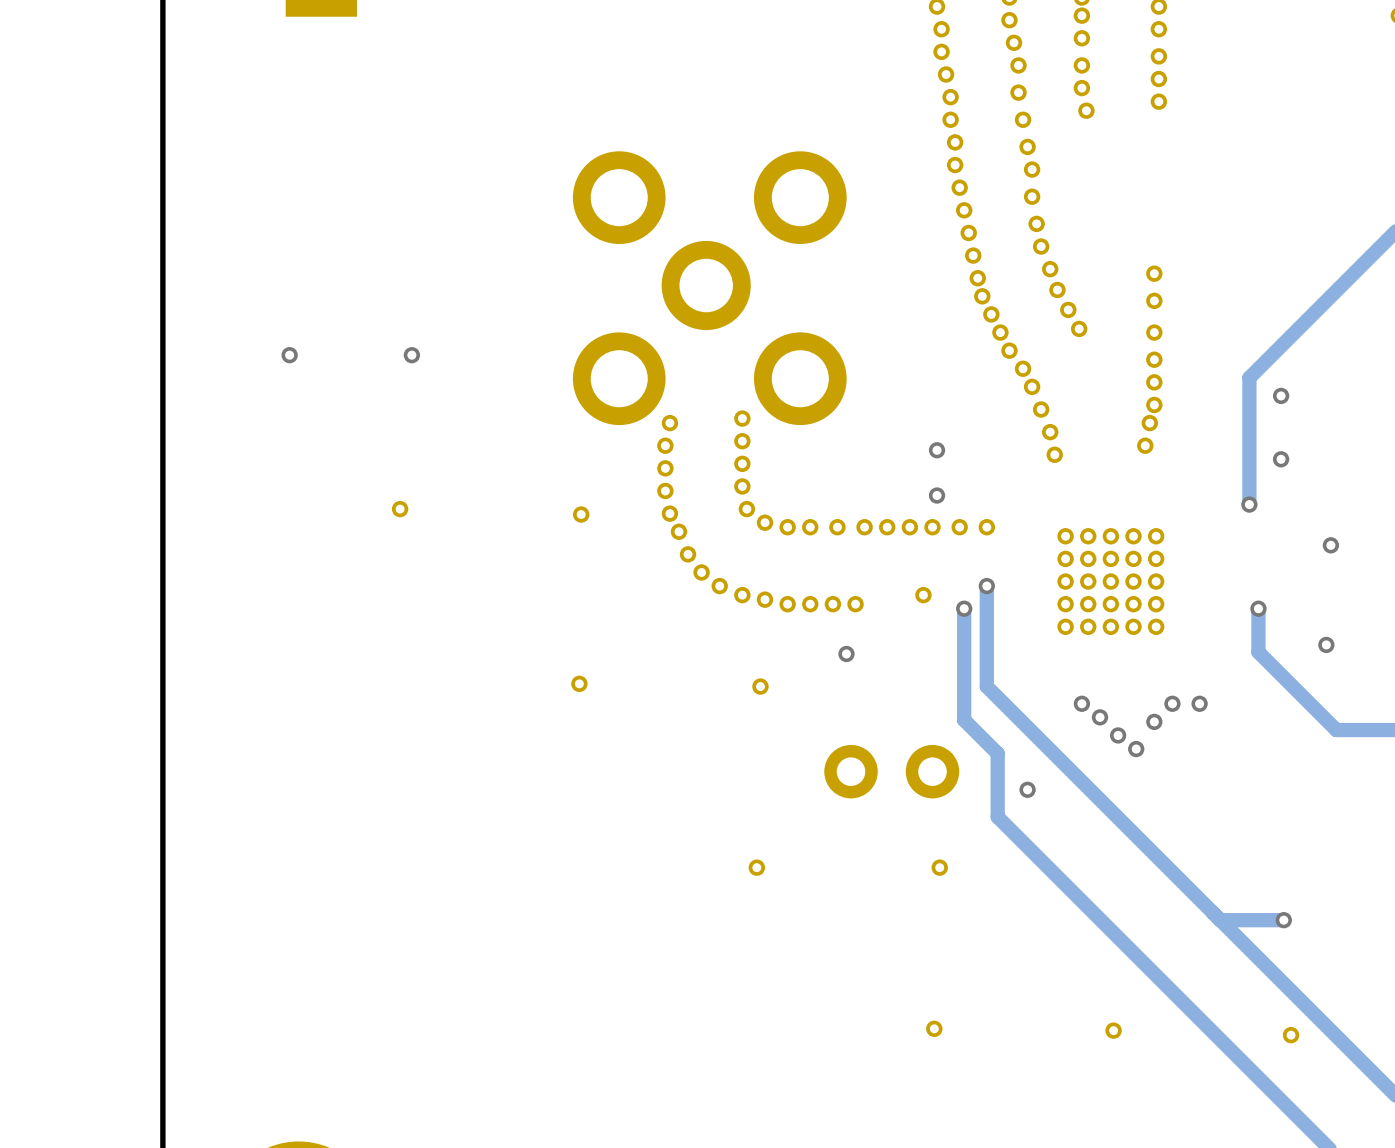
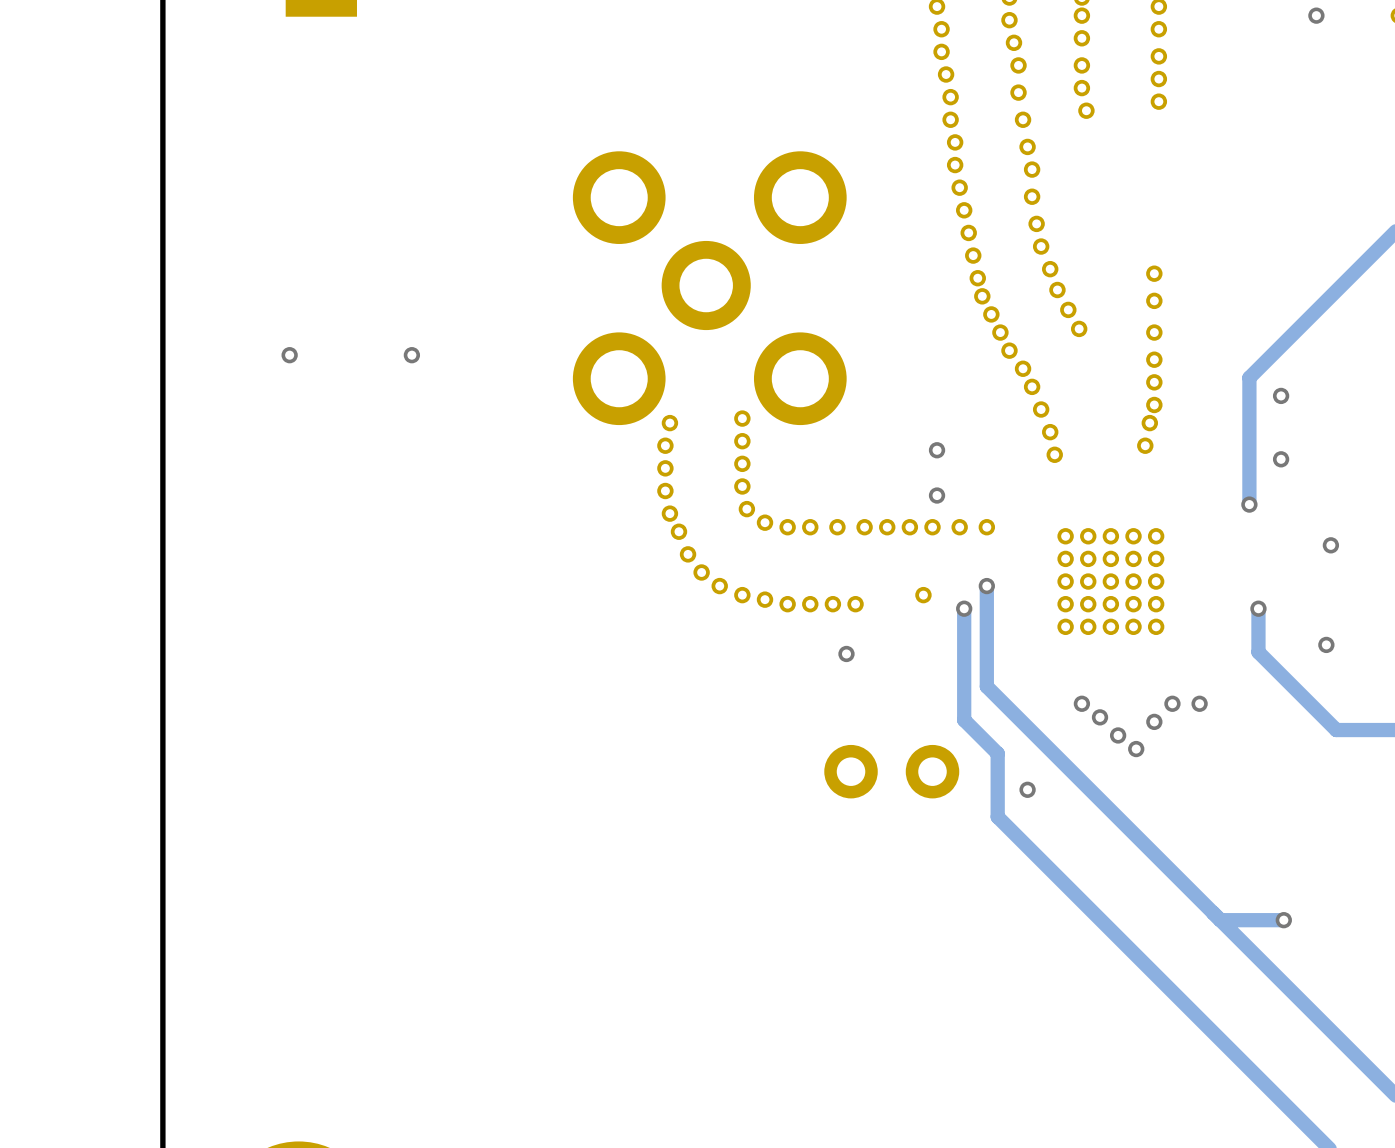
via: none -> (1316, 15)
part: (400, 509) -> none
part: (581, 514) -> none
part: (579, 683) -> none
part: (760, 686) -> none
part: (756, 867) -> none
part: (939, 867) -> none
part: (934, 1028) -> none
part: (1113, 1030) -> none
part: (1291, 1035) -> none

